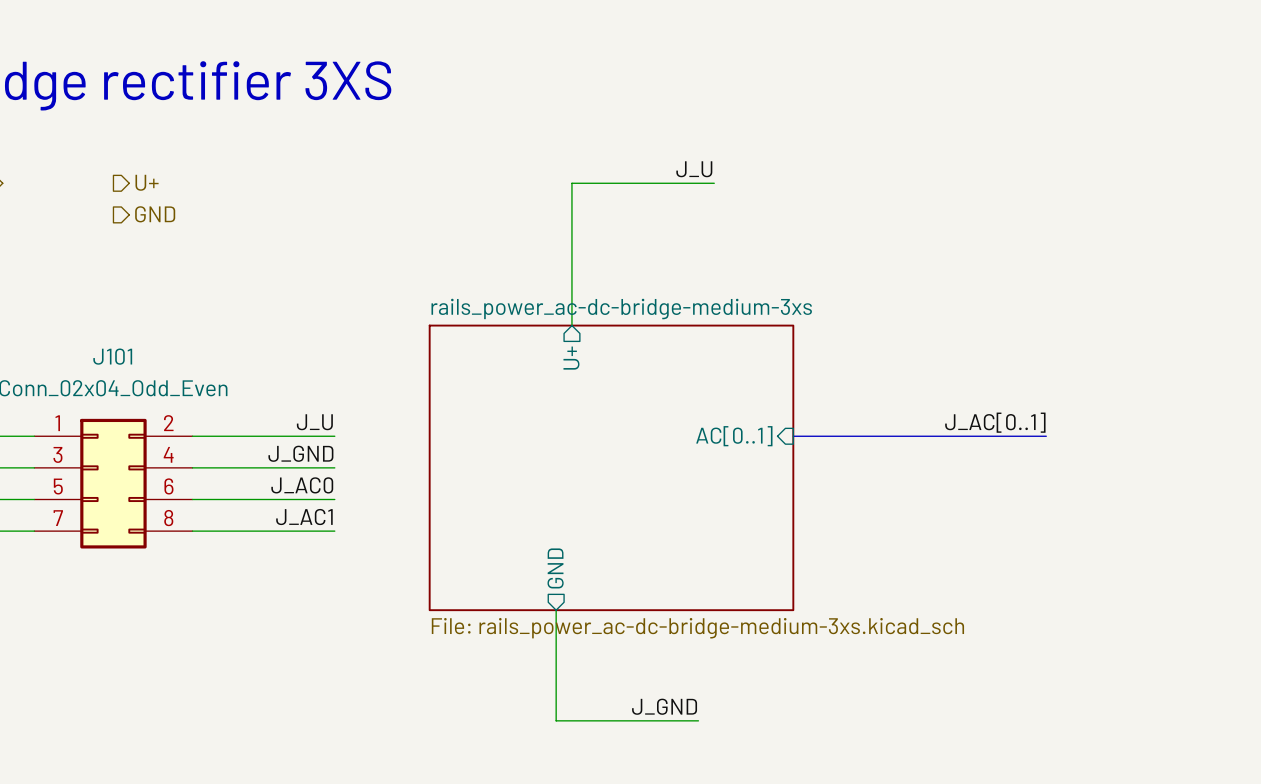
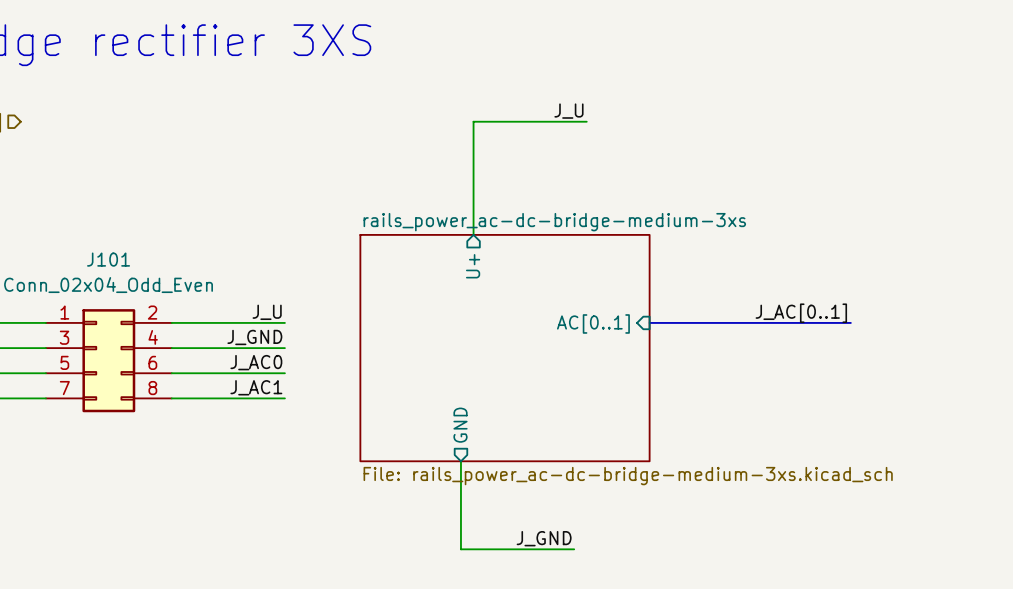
hierarchical label: U+ (147, 182) -> none
hierarchical label: GND (155, 214) -> none

